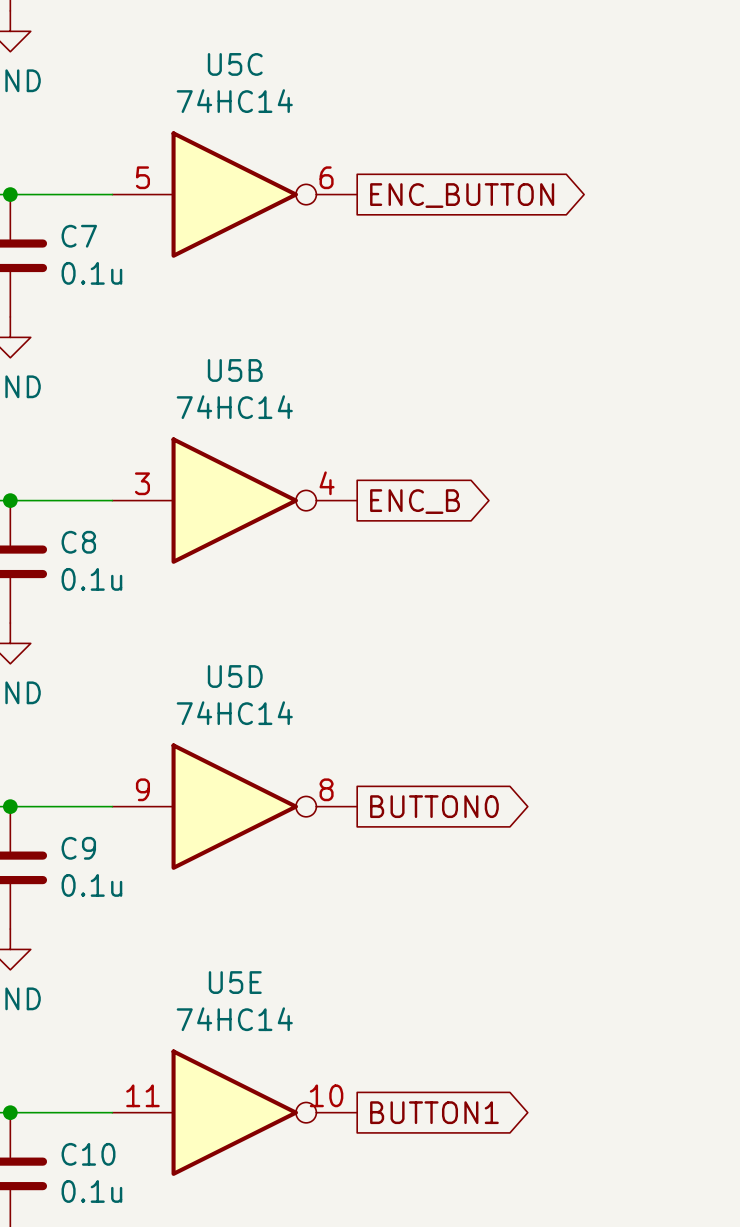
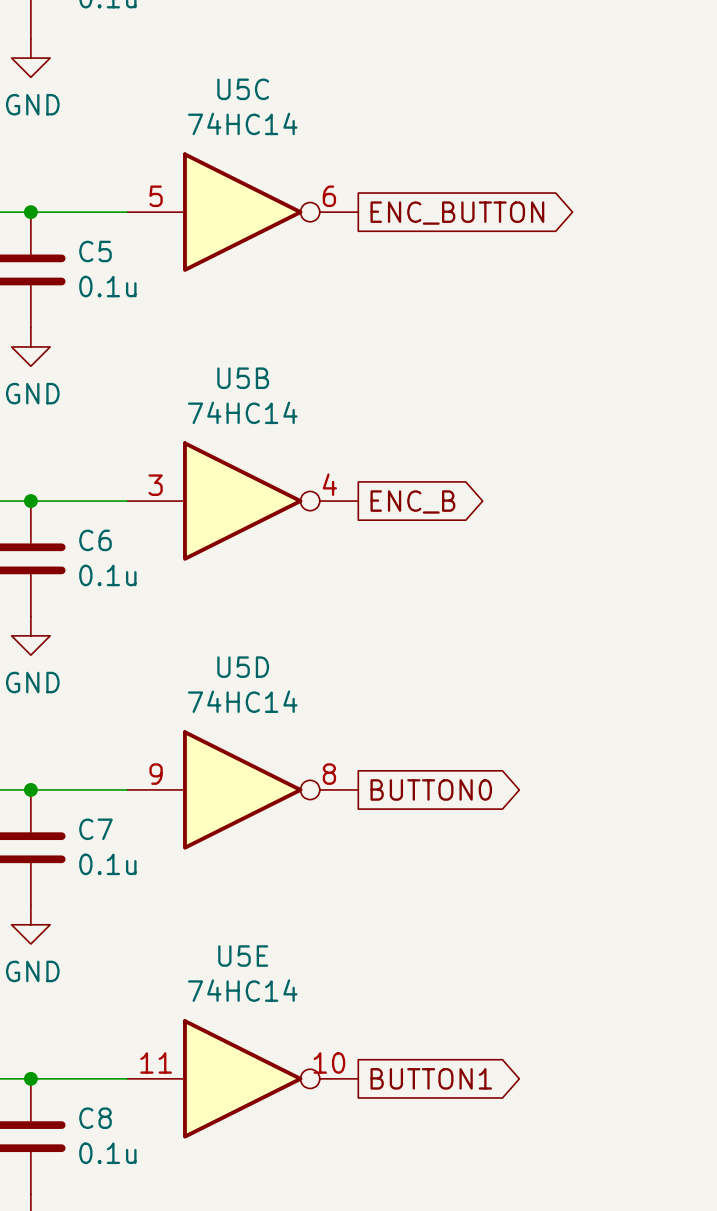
C7 name: C7 (79, 236) -> C5 (95, 251)
C8 name: C8 (78, 542) -> C6 (95, 540)
C9 name: C9 (78, 848) -> C7 (95, 829)
C10 name: C10 (88, 1154) -> C8 (95, 1118)

